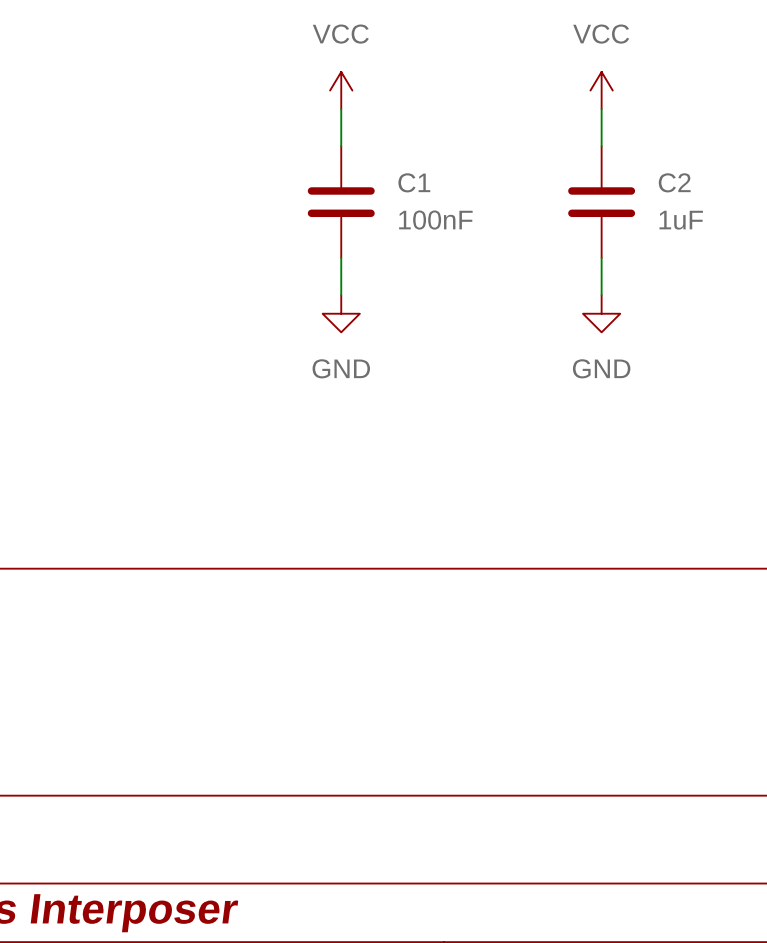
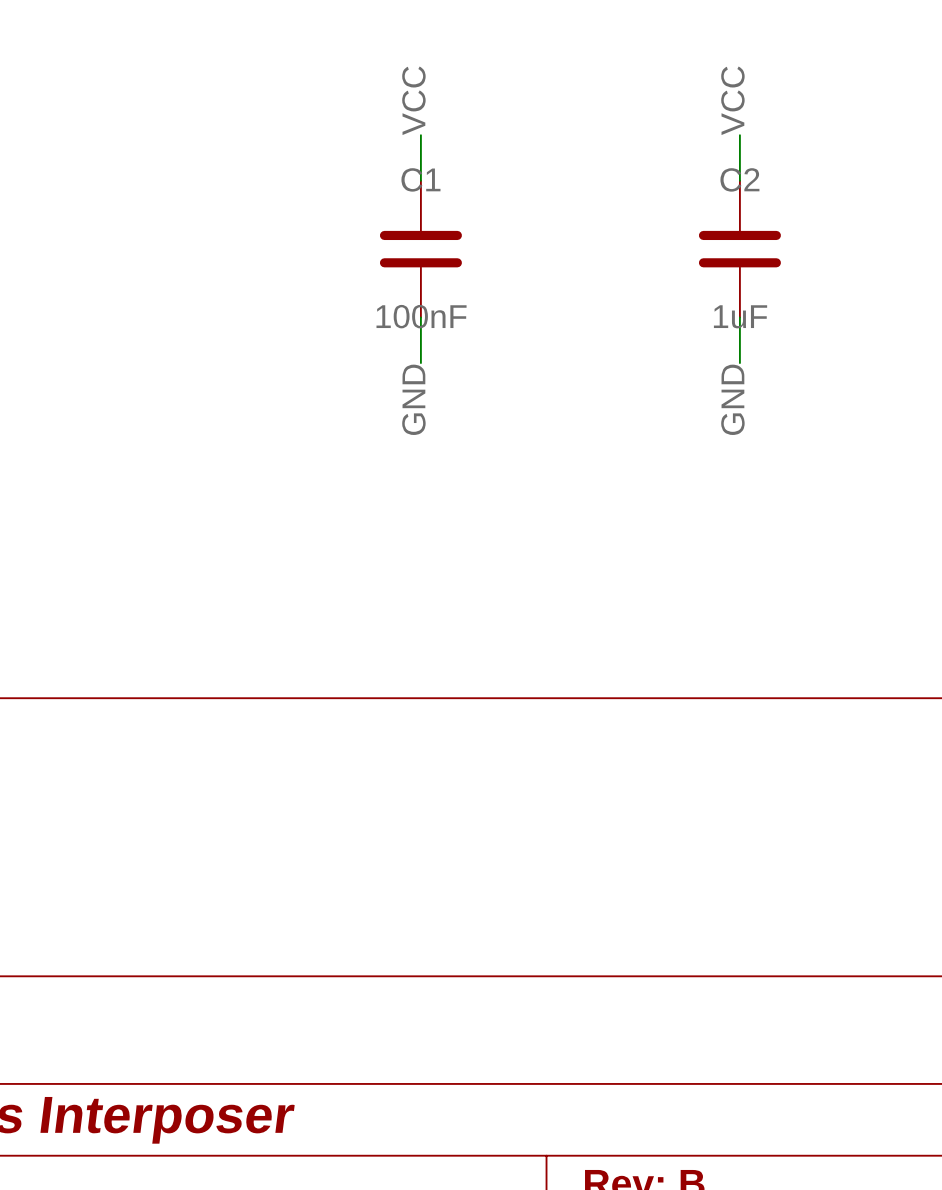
label: none -> VCC (413, 100)
label: none -> VCC (732, 100)
power symbol: VCC (341, 90) -> none
power symbol: VCC (601, 90) -> none
C1 name position: C1 (414, 182) -> C1 (420, 179)
C2 name position: C2 (674, 182) -> C2 (739, 179)
C1 value position: 100nF (435, 220) -> 100nF (421, 316)
C2 value position: 1uF (681, 220) -> 1uF (740, 316)
power symbol: GND (341, 313) -> none
power symbol: GND (601, 313) -> none
label: none -> GND (413, 399)
label: none -> GND (732, 399)

